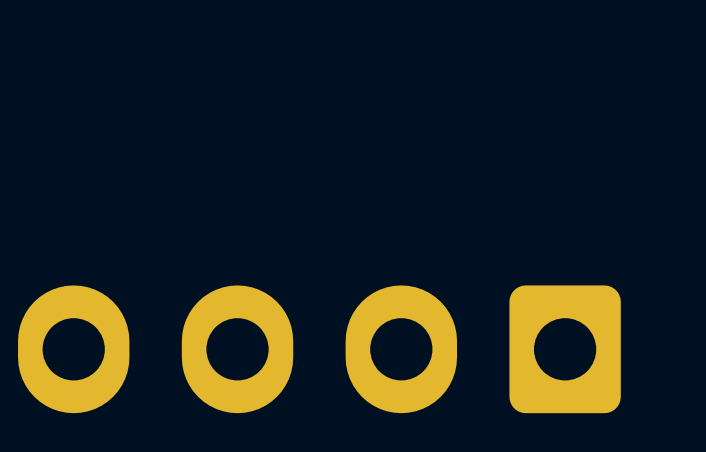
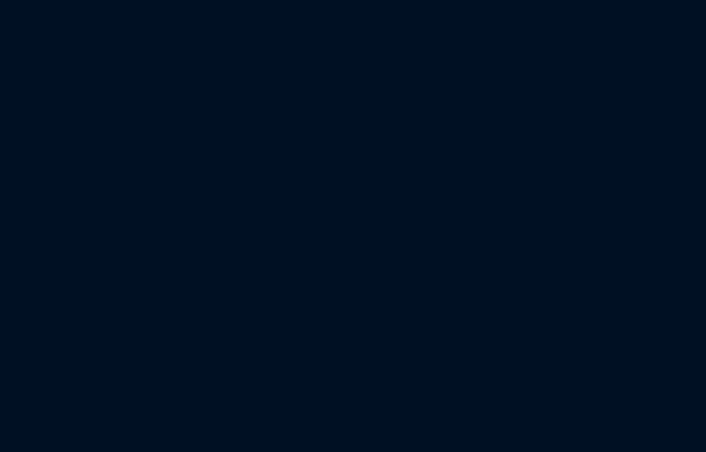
part: (319, 349) -> none

